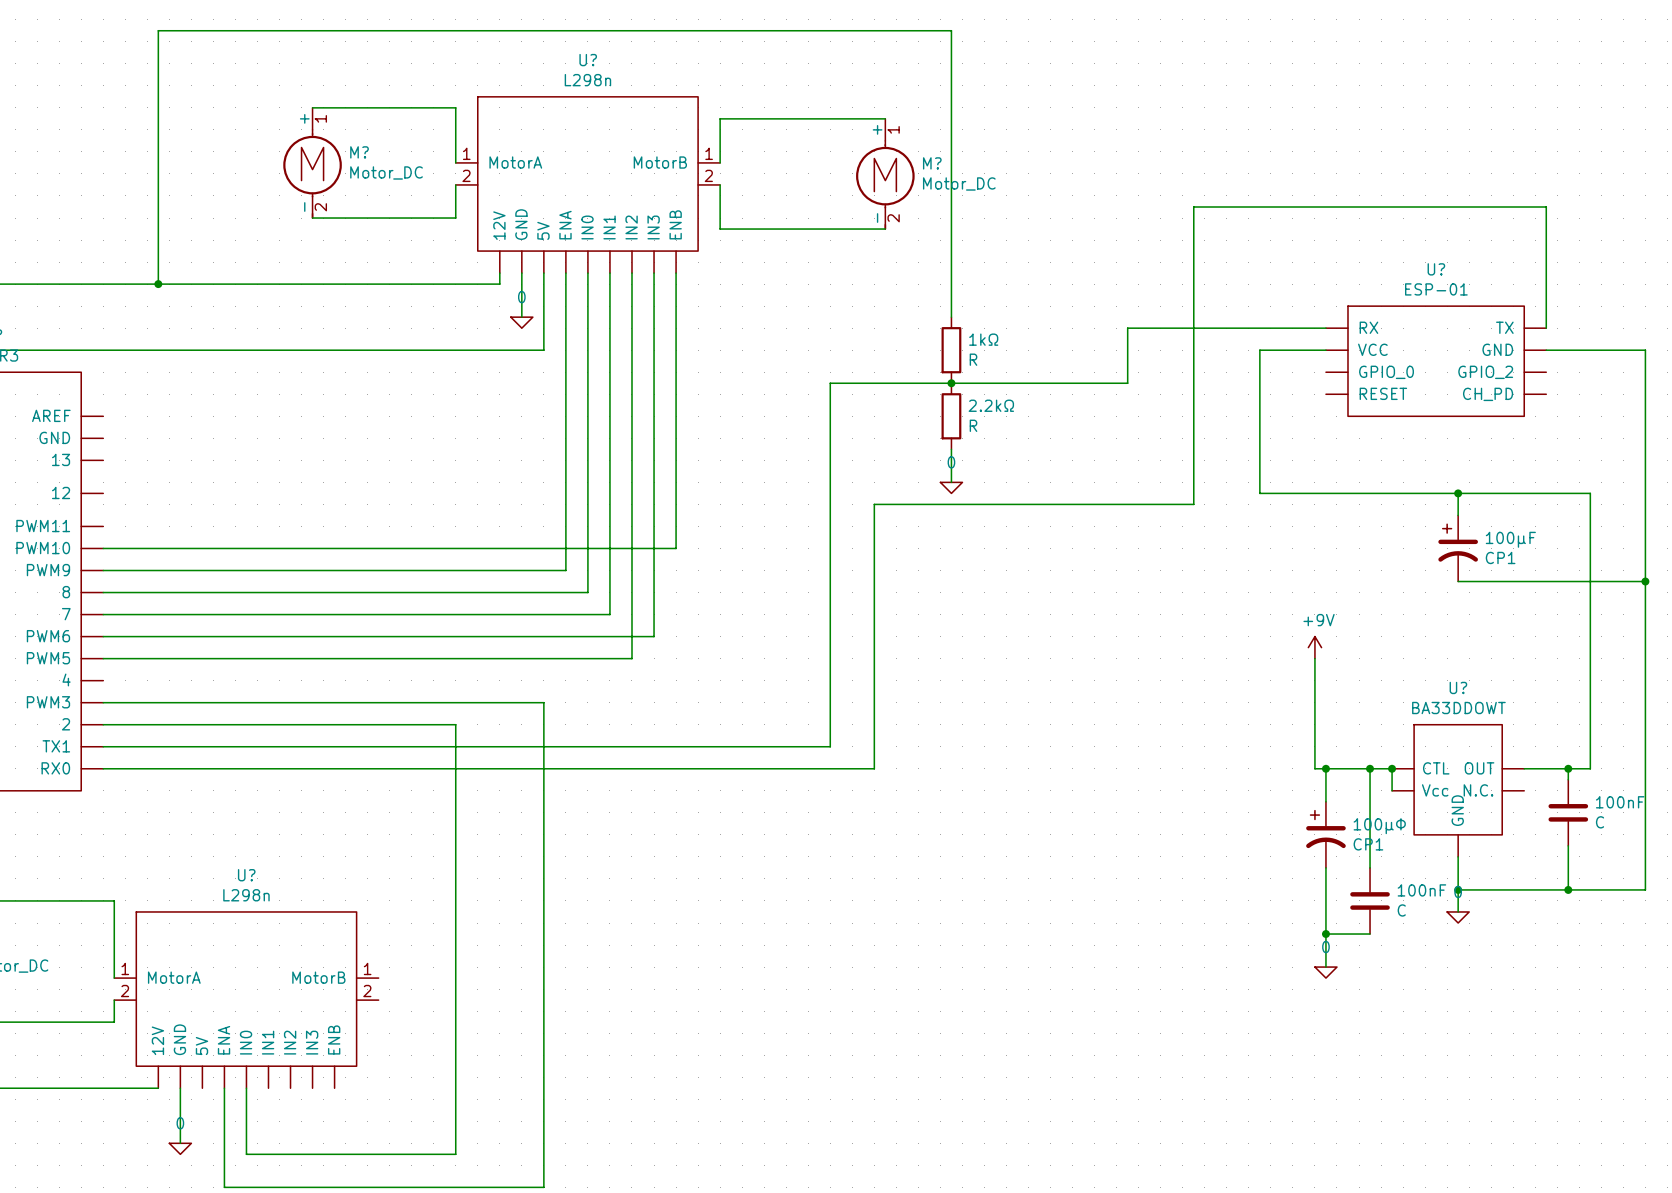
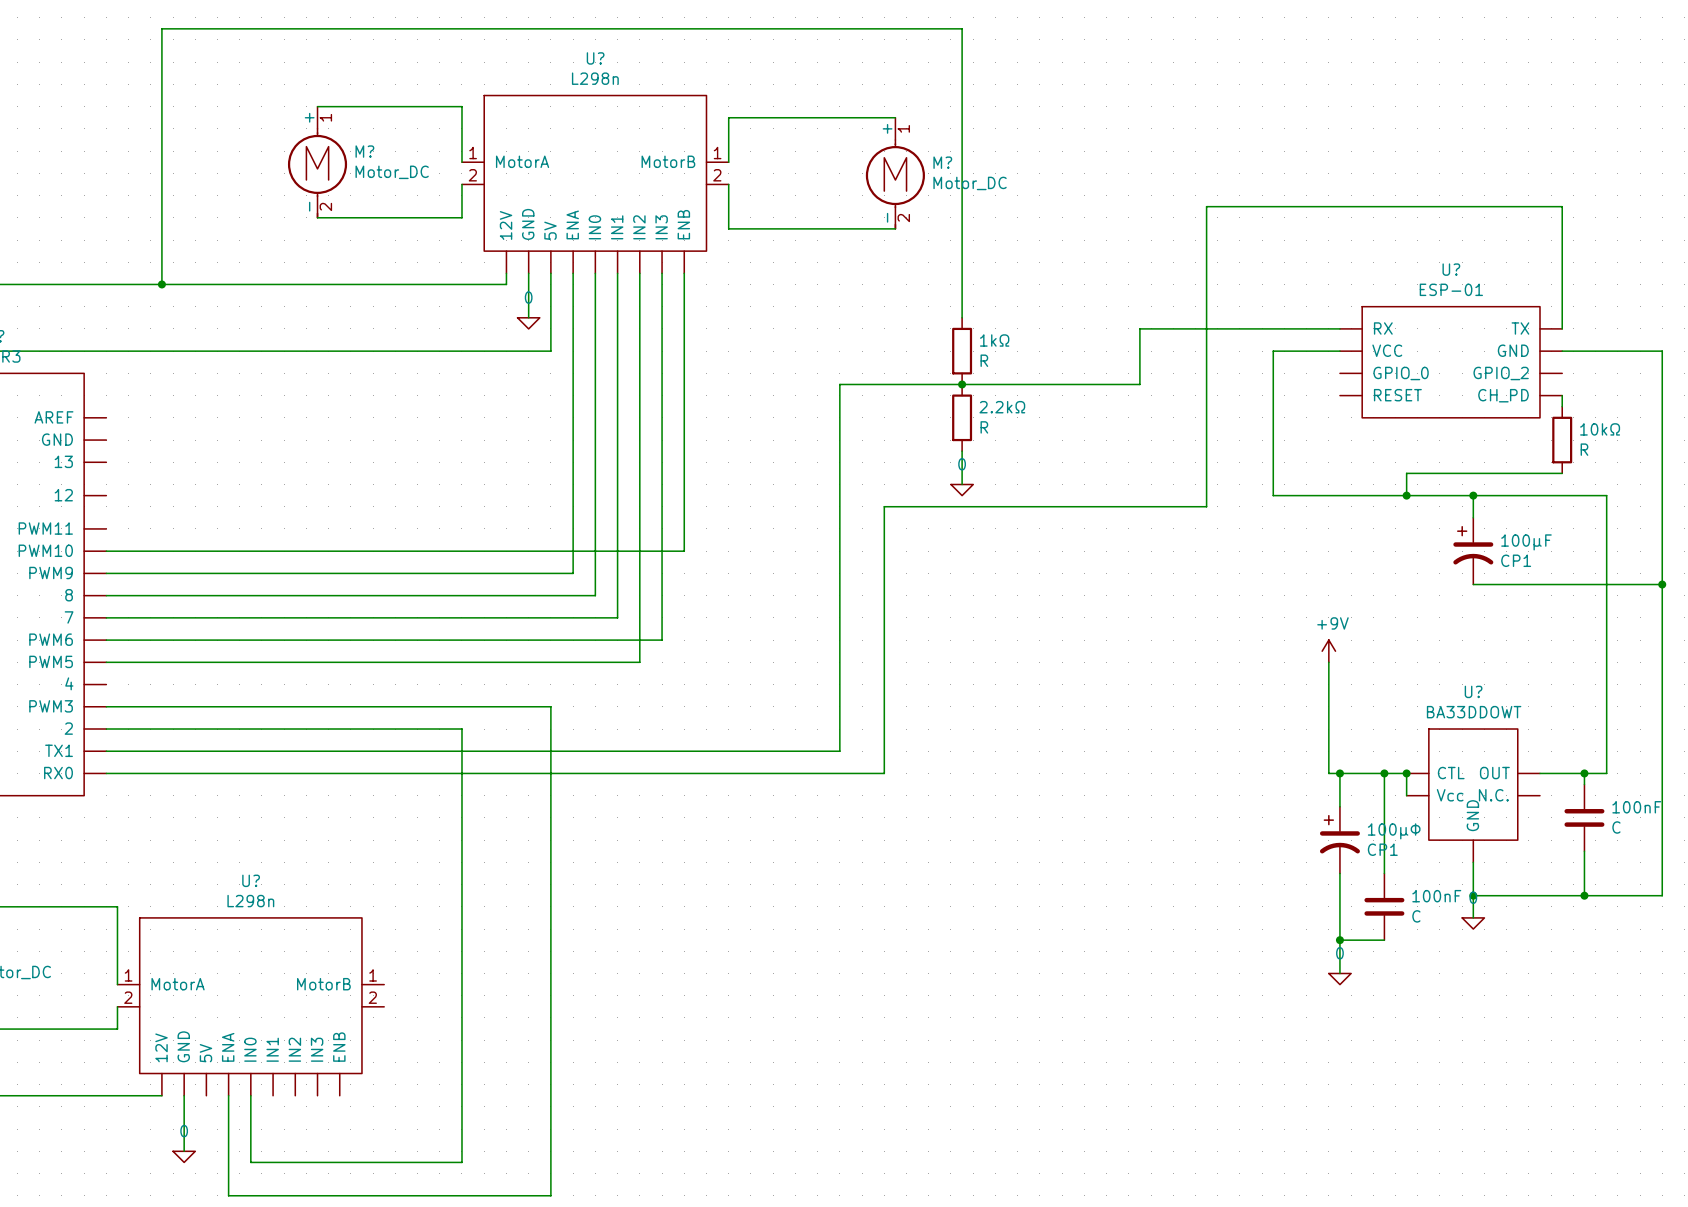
wire: none -> (1562, 395) (1562, 406)
10kΩ: none -> R (1562, 440)
wire: none -> (1562, 473) (1406, 473) (1406, 495)
junction: none -> (1406, 495)

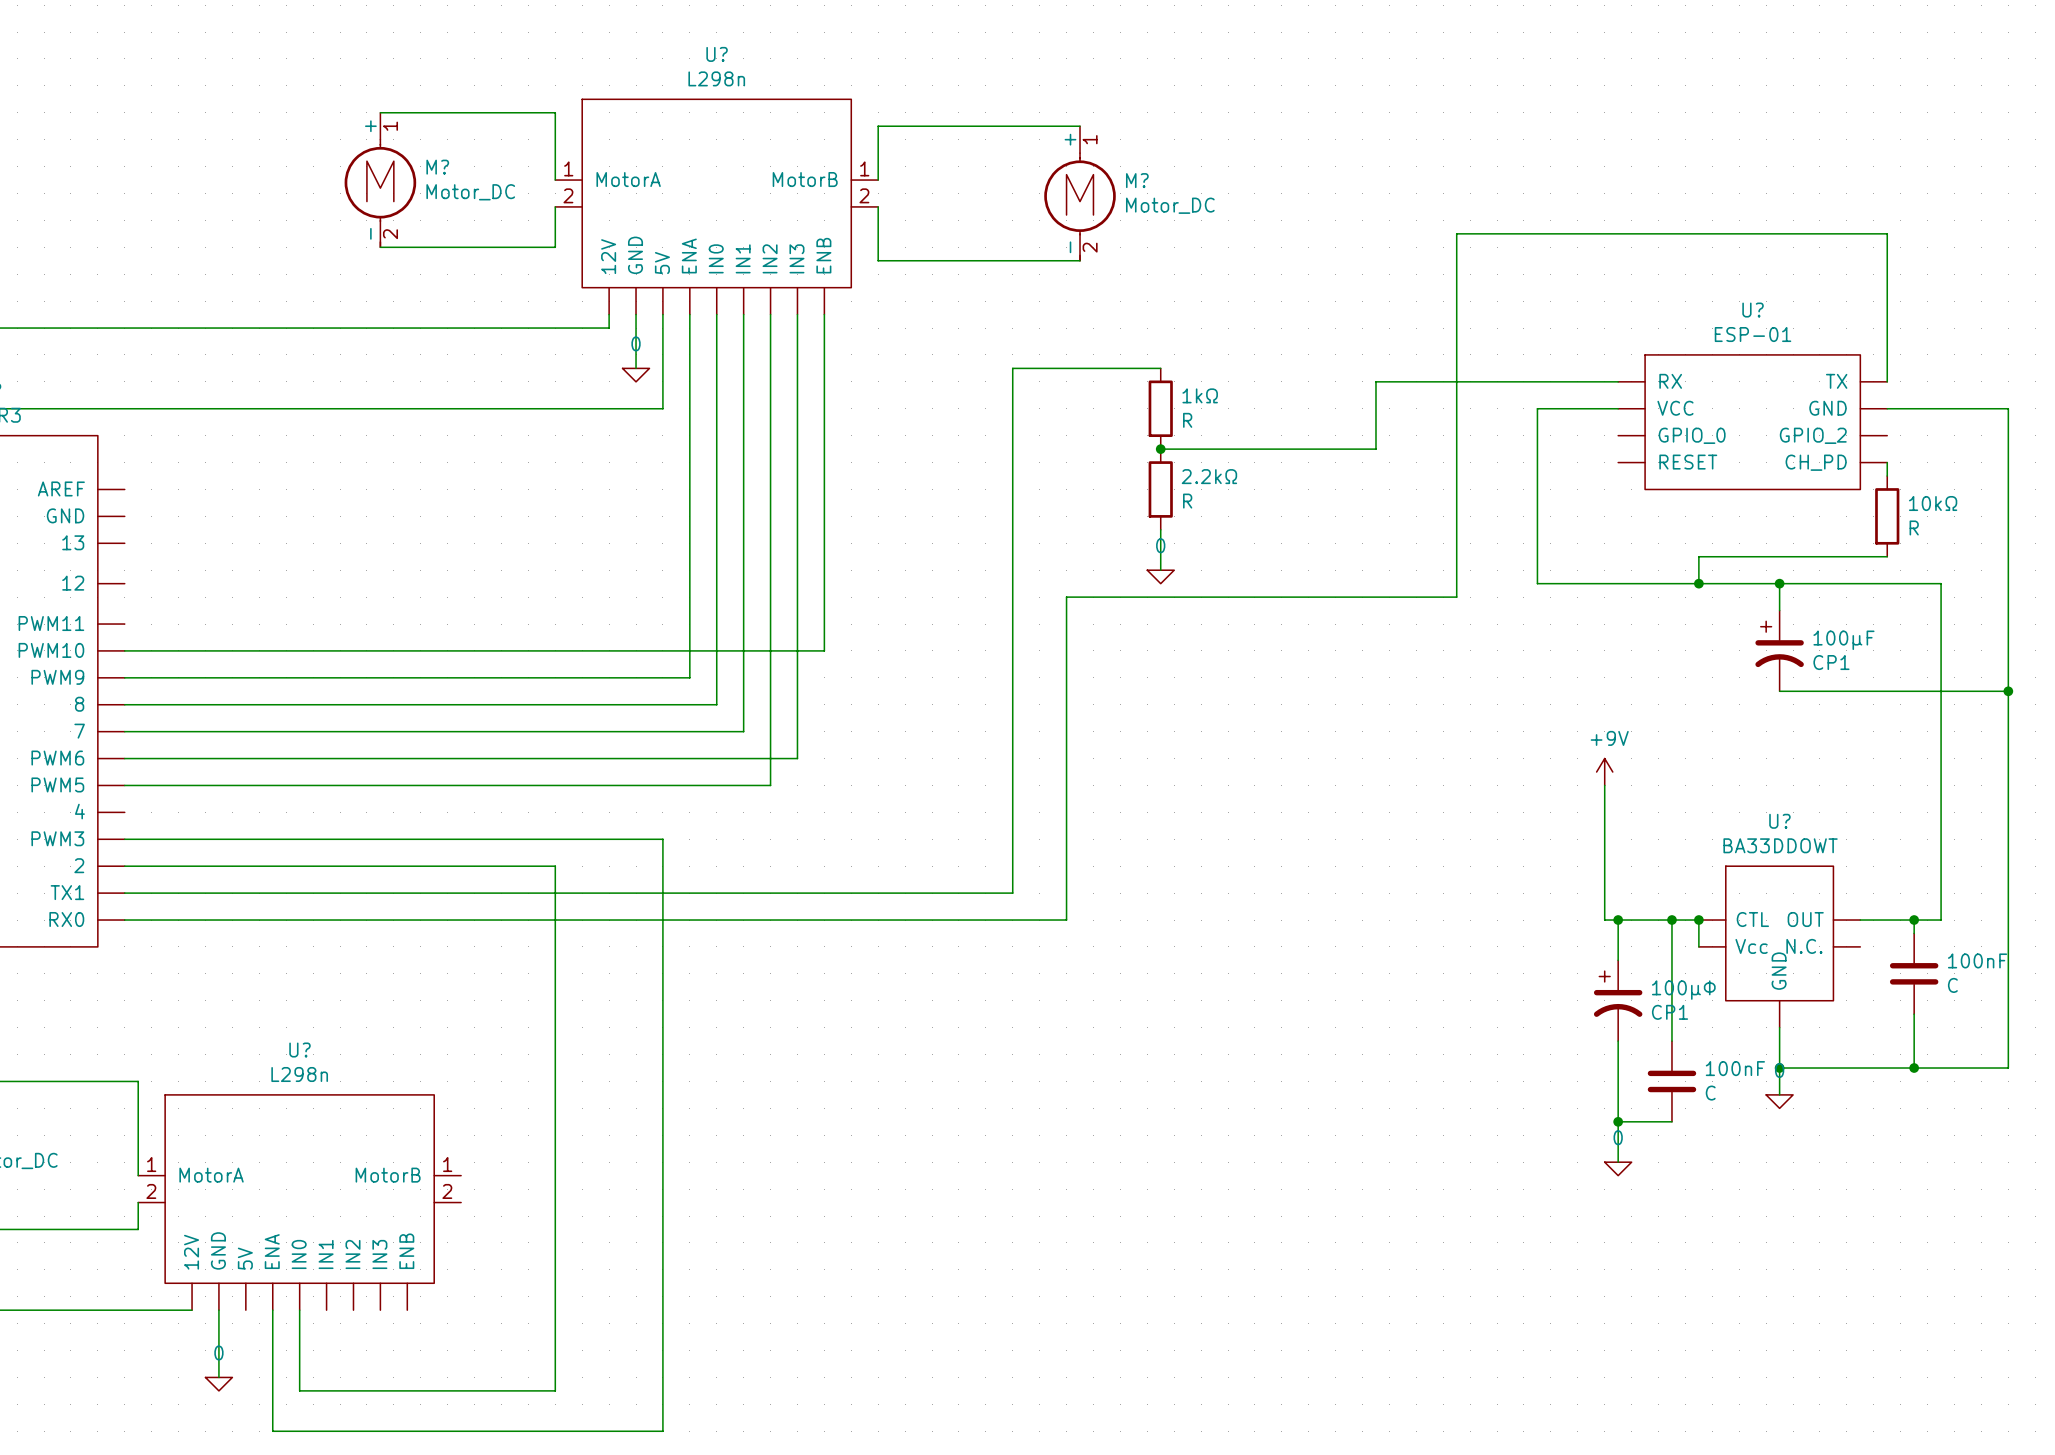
wire: (161, 284) (161, 28) (962, 28) (962, 317) -> none
junction: (161, 284) -> none
wire: (839, 384) (962, 384) -> (1012, 449) (1012, 368) (1160, 368)

